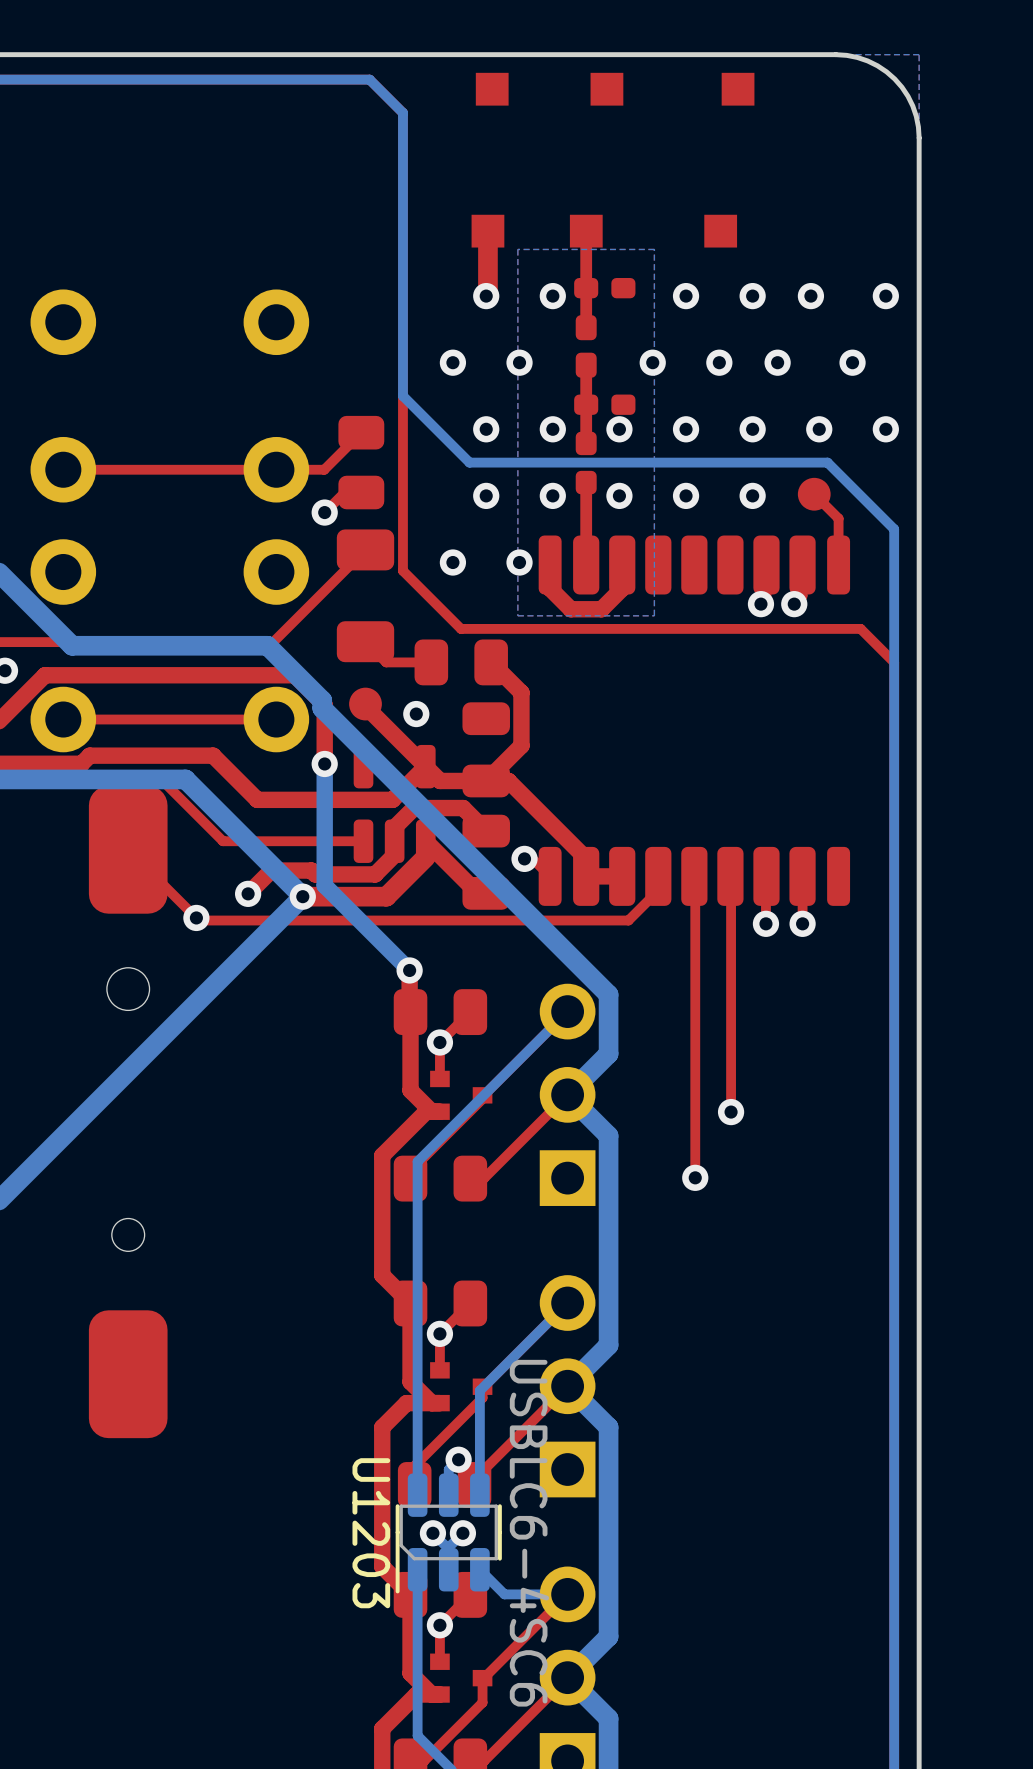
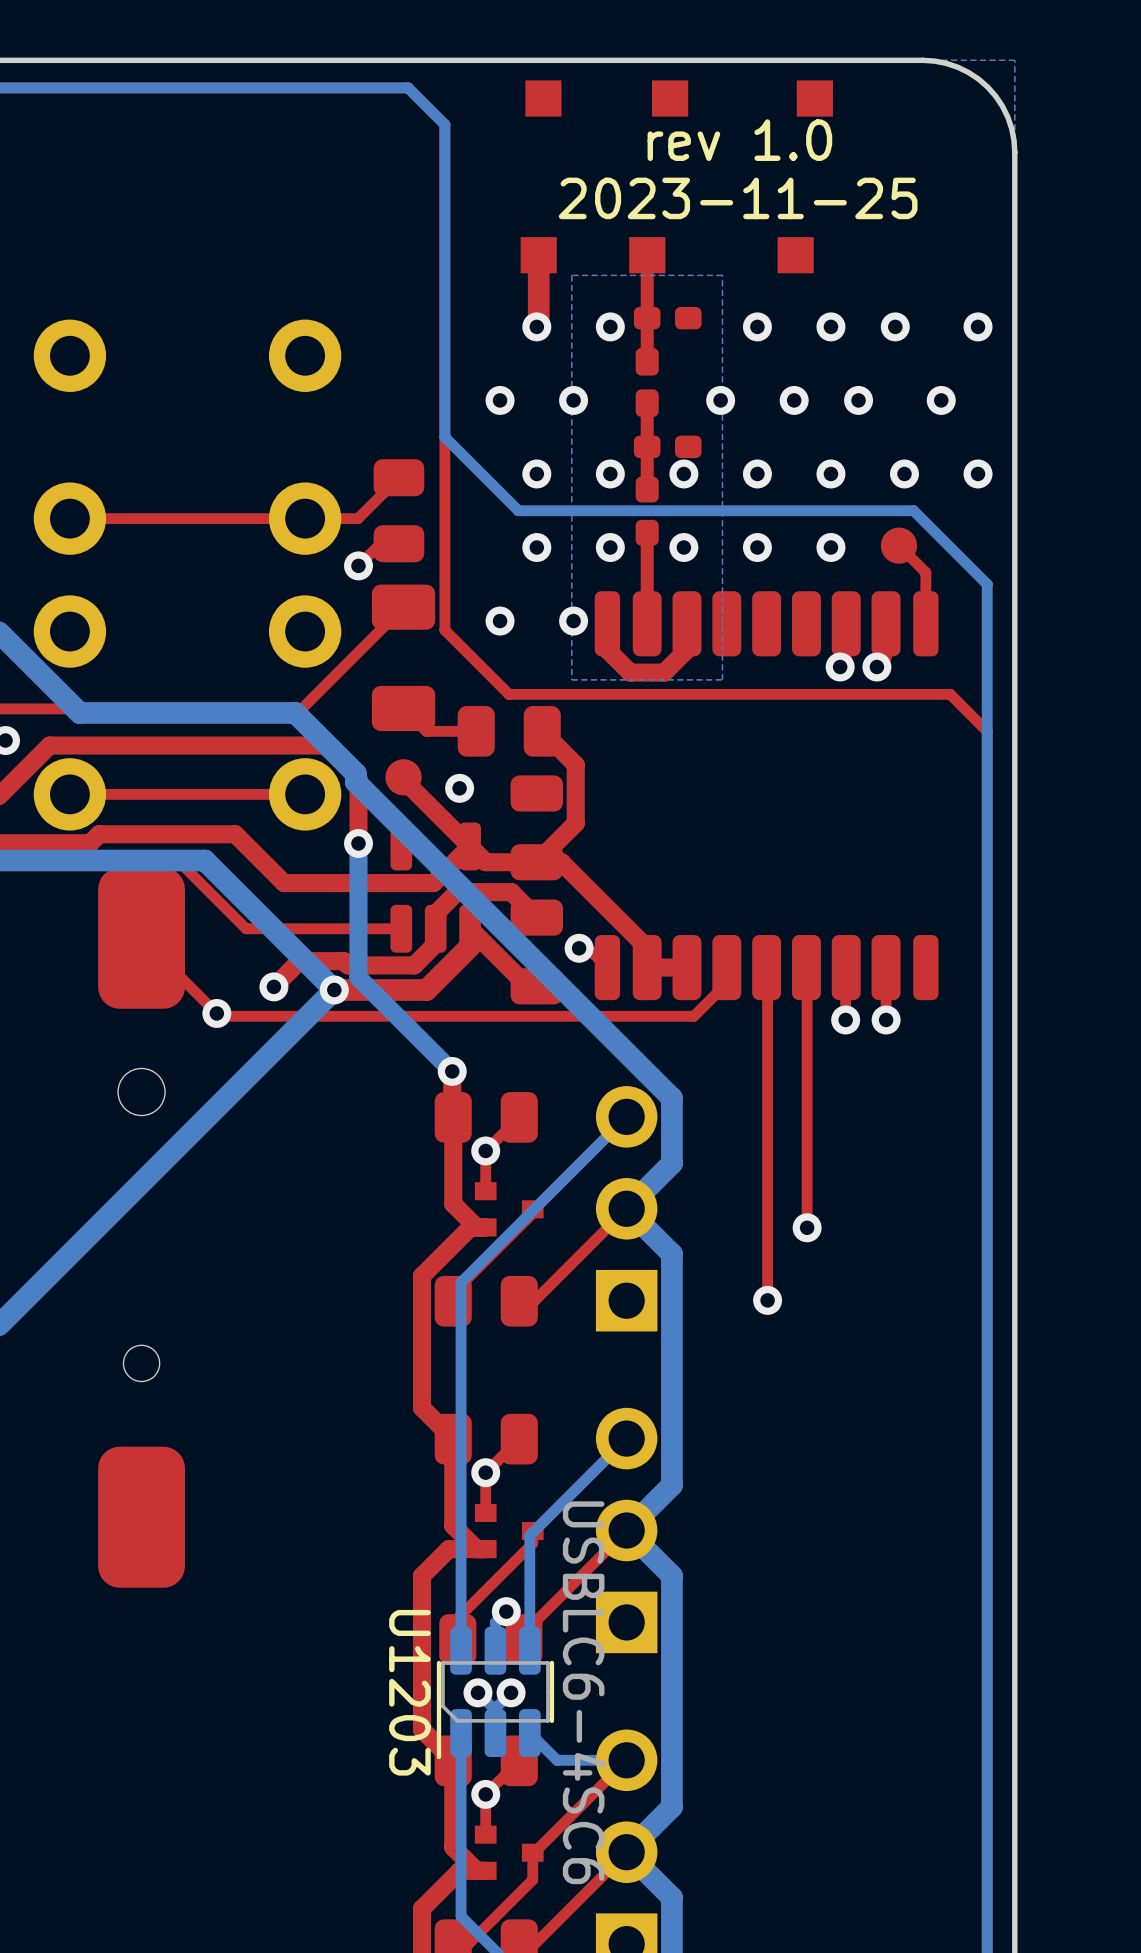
text: none -> rev 1.0 (739, 140)
text: none -> 2023-11-25 (738, 198)

